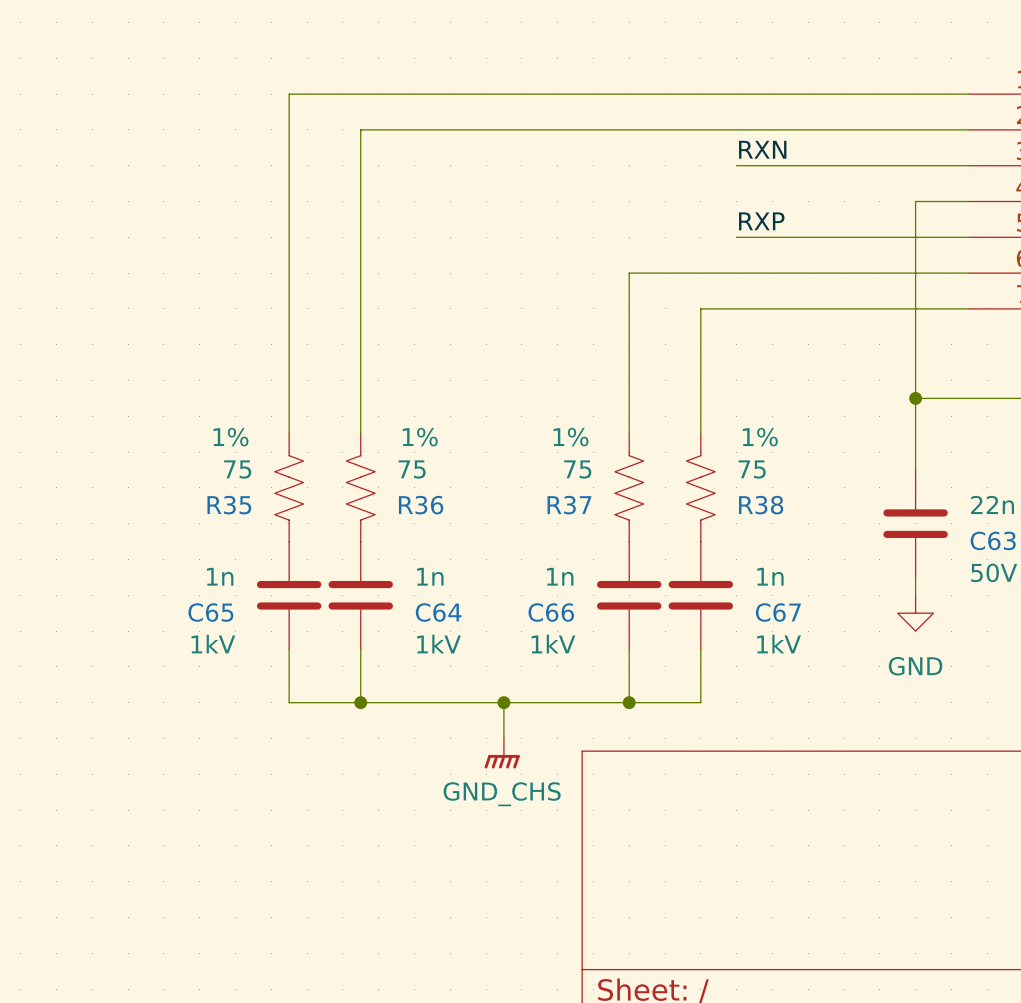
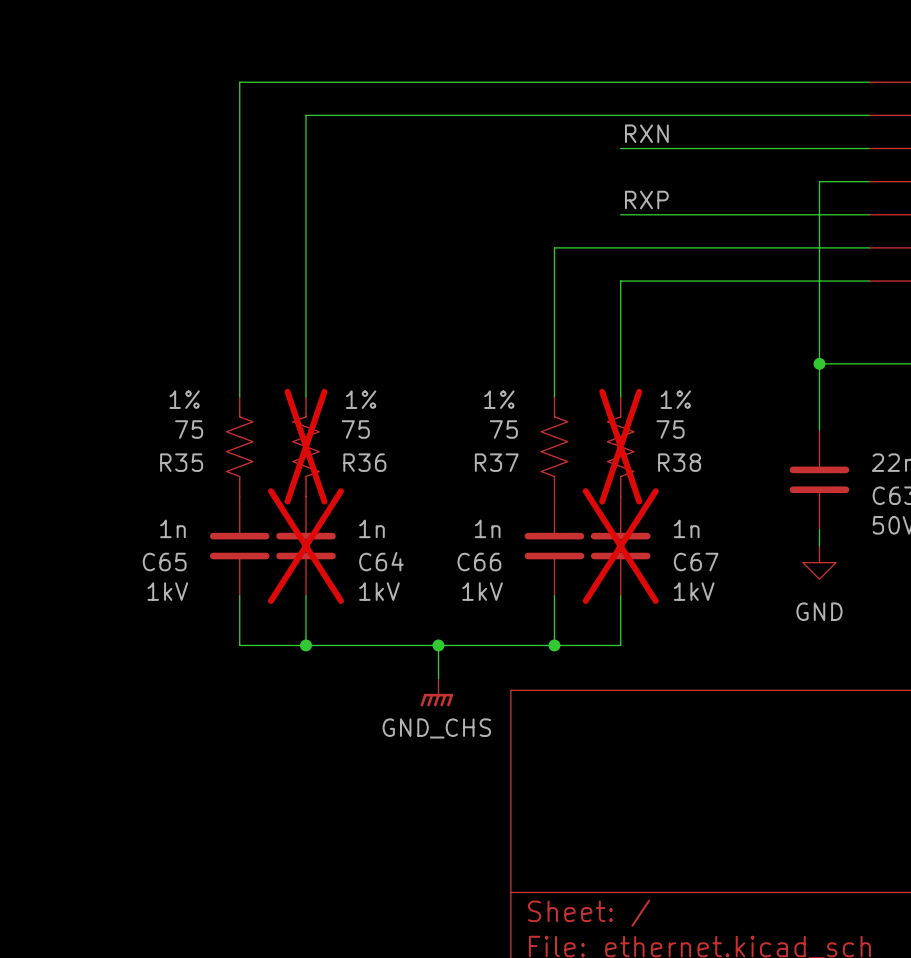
label position: RXN (762, 149) -> RXN (646, 133)
wire: none -> (620, 148) (653, 148)
label position: RXP (761, 221) -> RXP (646, 200)
wire: none -> (620, 214) (653, 214)
R36 do-not-place cross: none -> (305, 446)
R38 do-not-place cross: none -> (620, 446)
C64 do-not-place cross: none -> (305, 546)
C67 do-not-place cross: none -> (620, 546)

